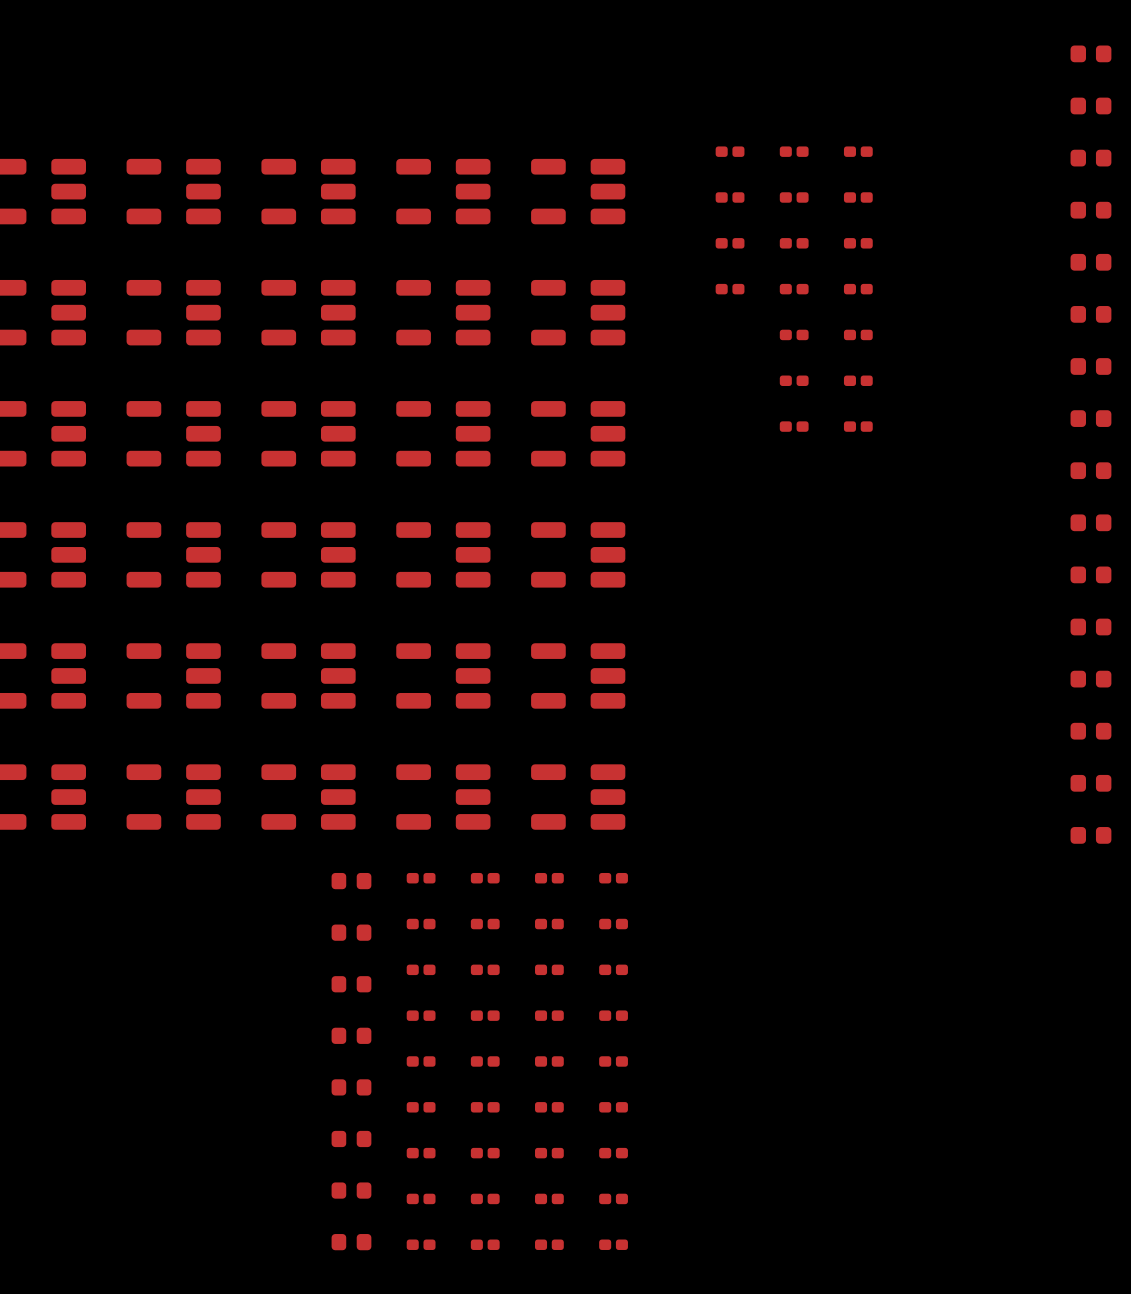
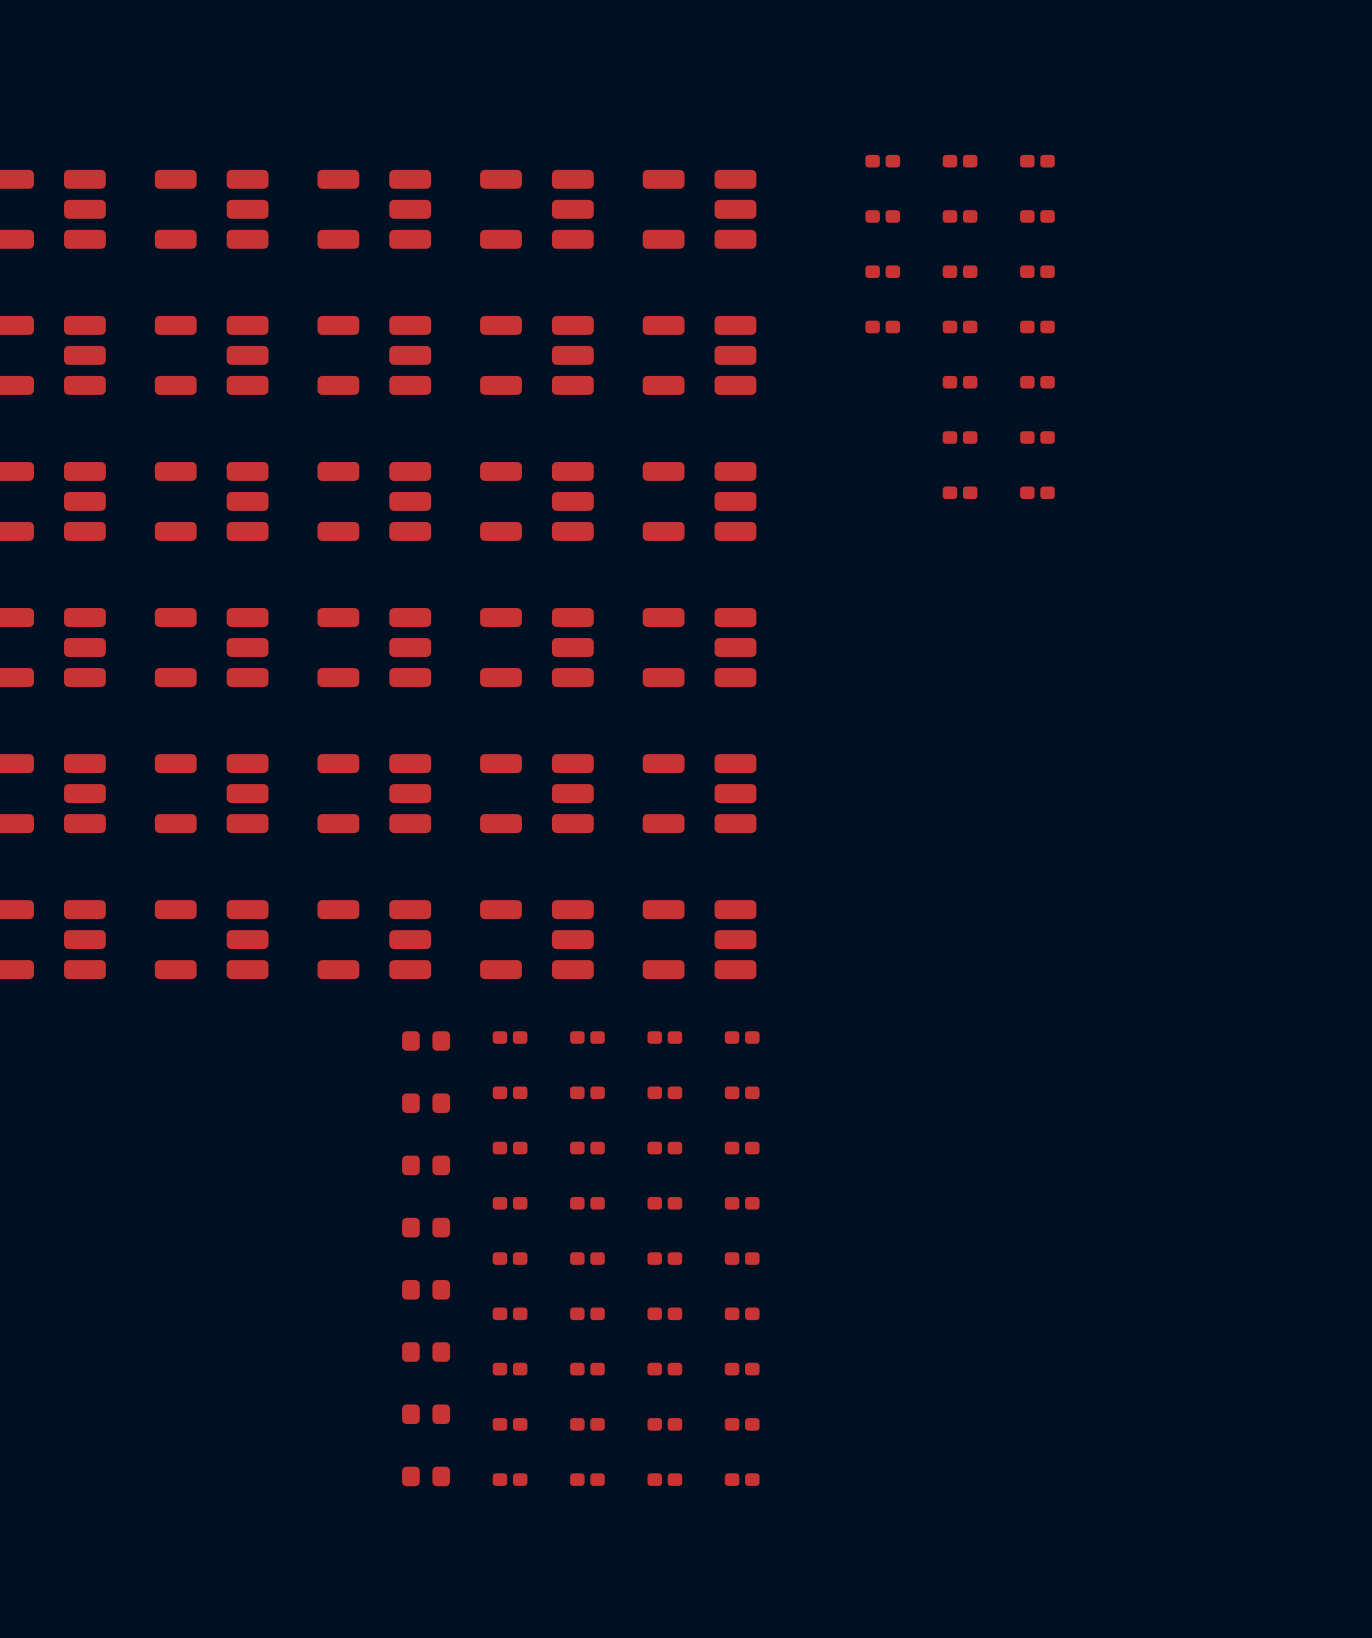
part: (1090, 53) -> none
part: (1090, 105) -> none
part: (1090, 158) -> none
part: (1090, 210) -> none
part: (1090, 262) -> none
part: (1090, 314) -> none
part: (1090, 366) -> none
part: (1090, 418) -> none
part: (1090, 470) -> none
part: (1090, 522) -> none
part: (1090, 574) -> none
part: (1090, 627) -> none
part: (1090, 679) -> none
part: (1090, 731) -> none
part: (1090, 783) -> none
part: (1090, 835) -> none

